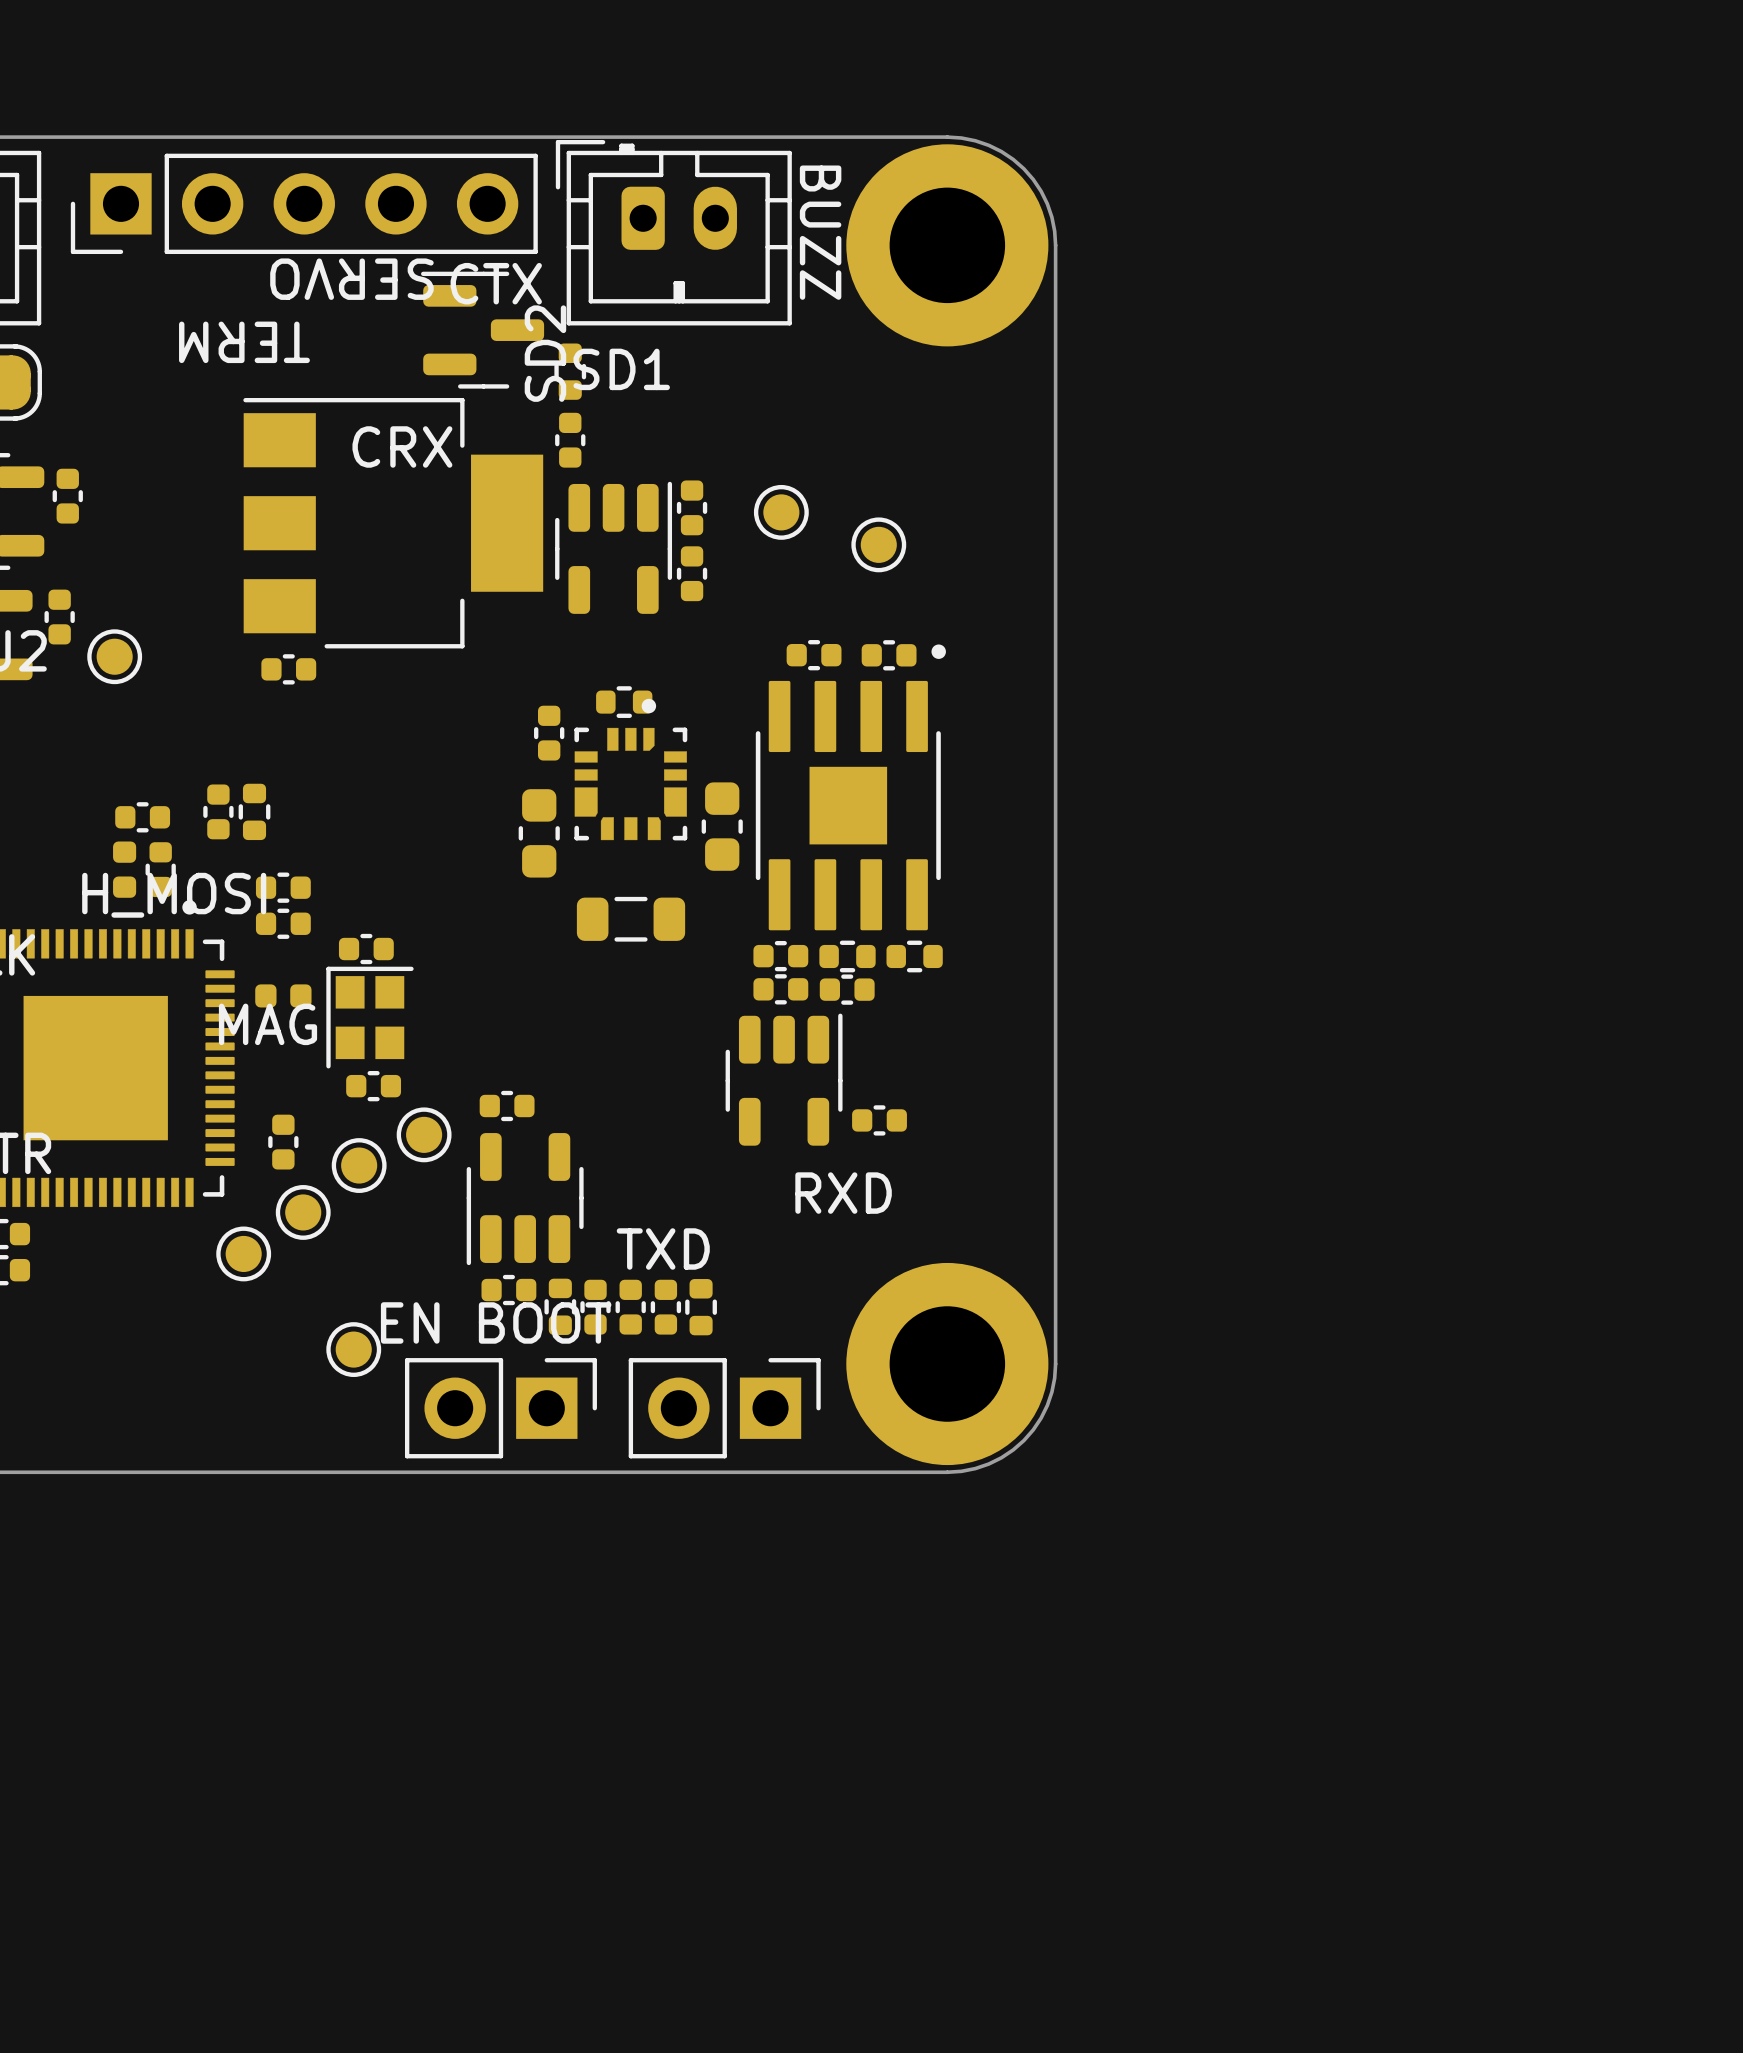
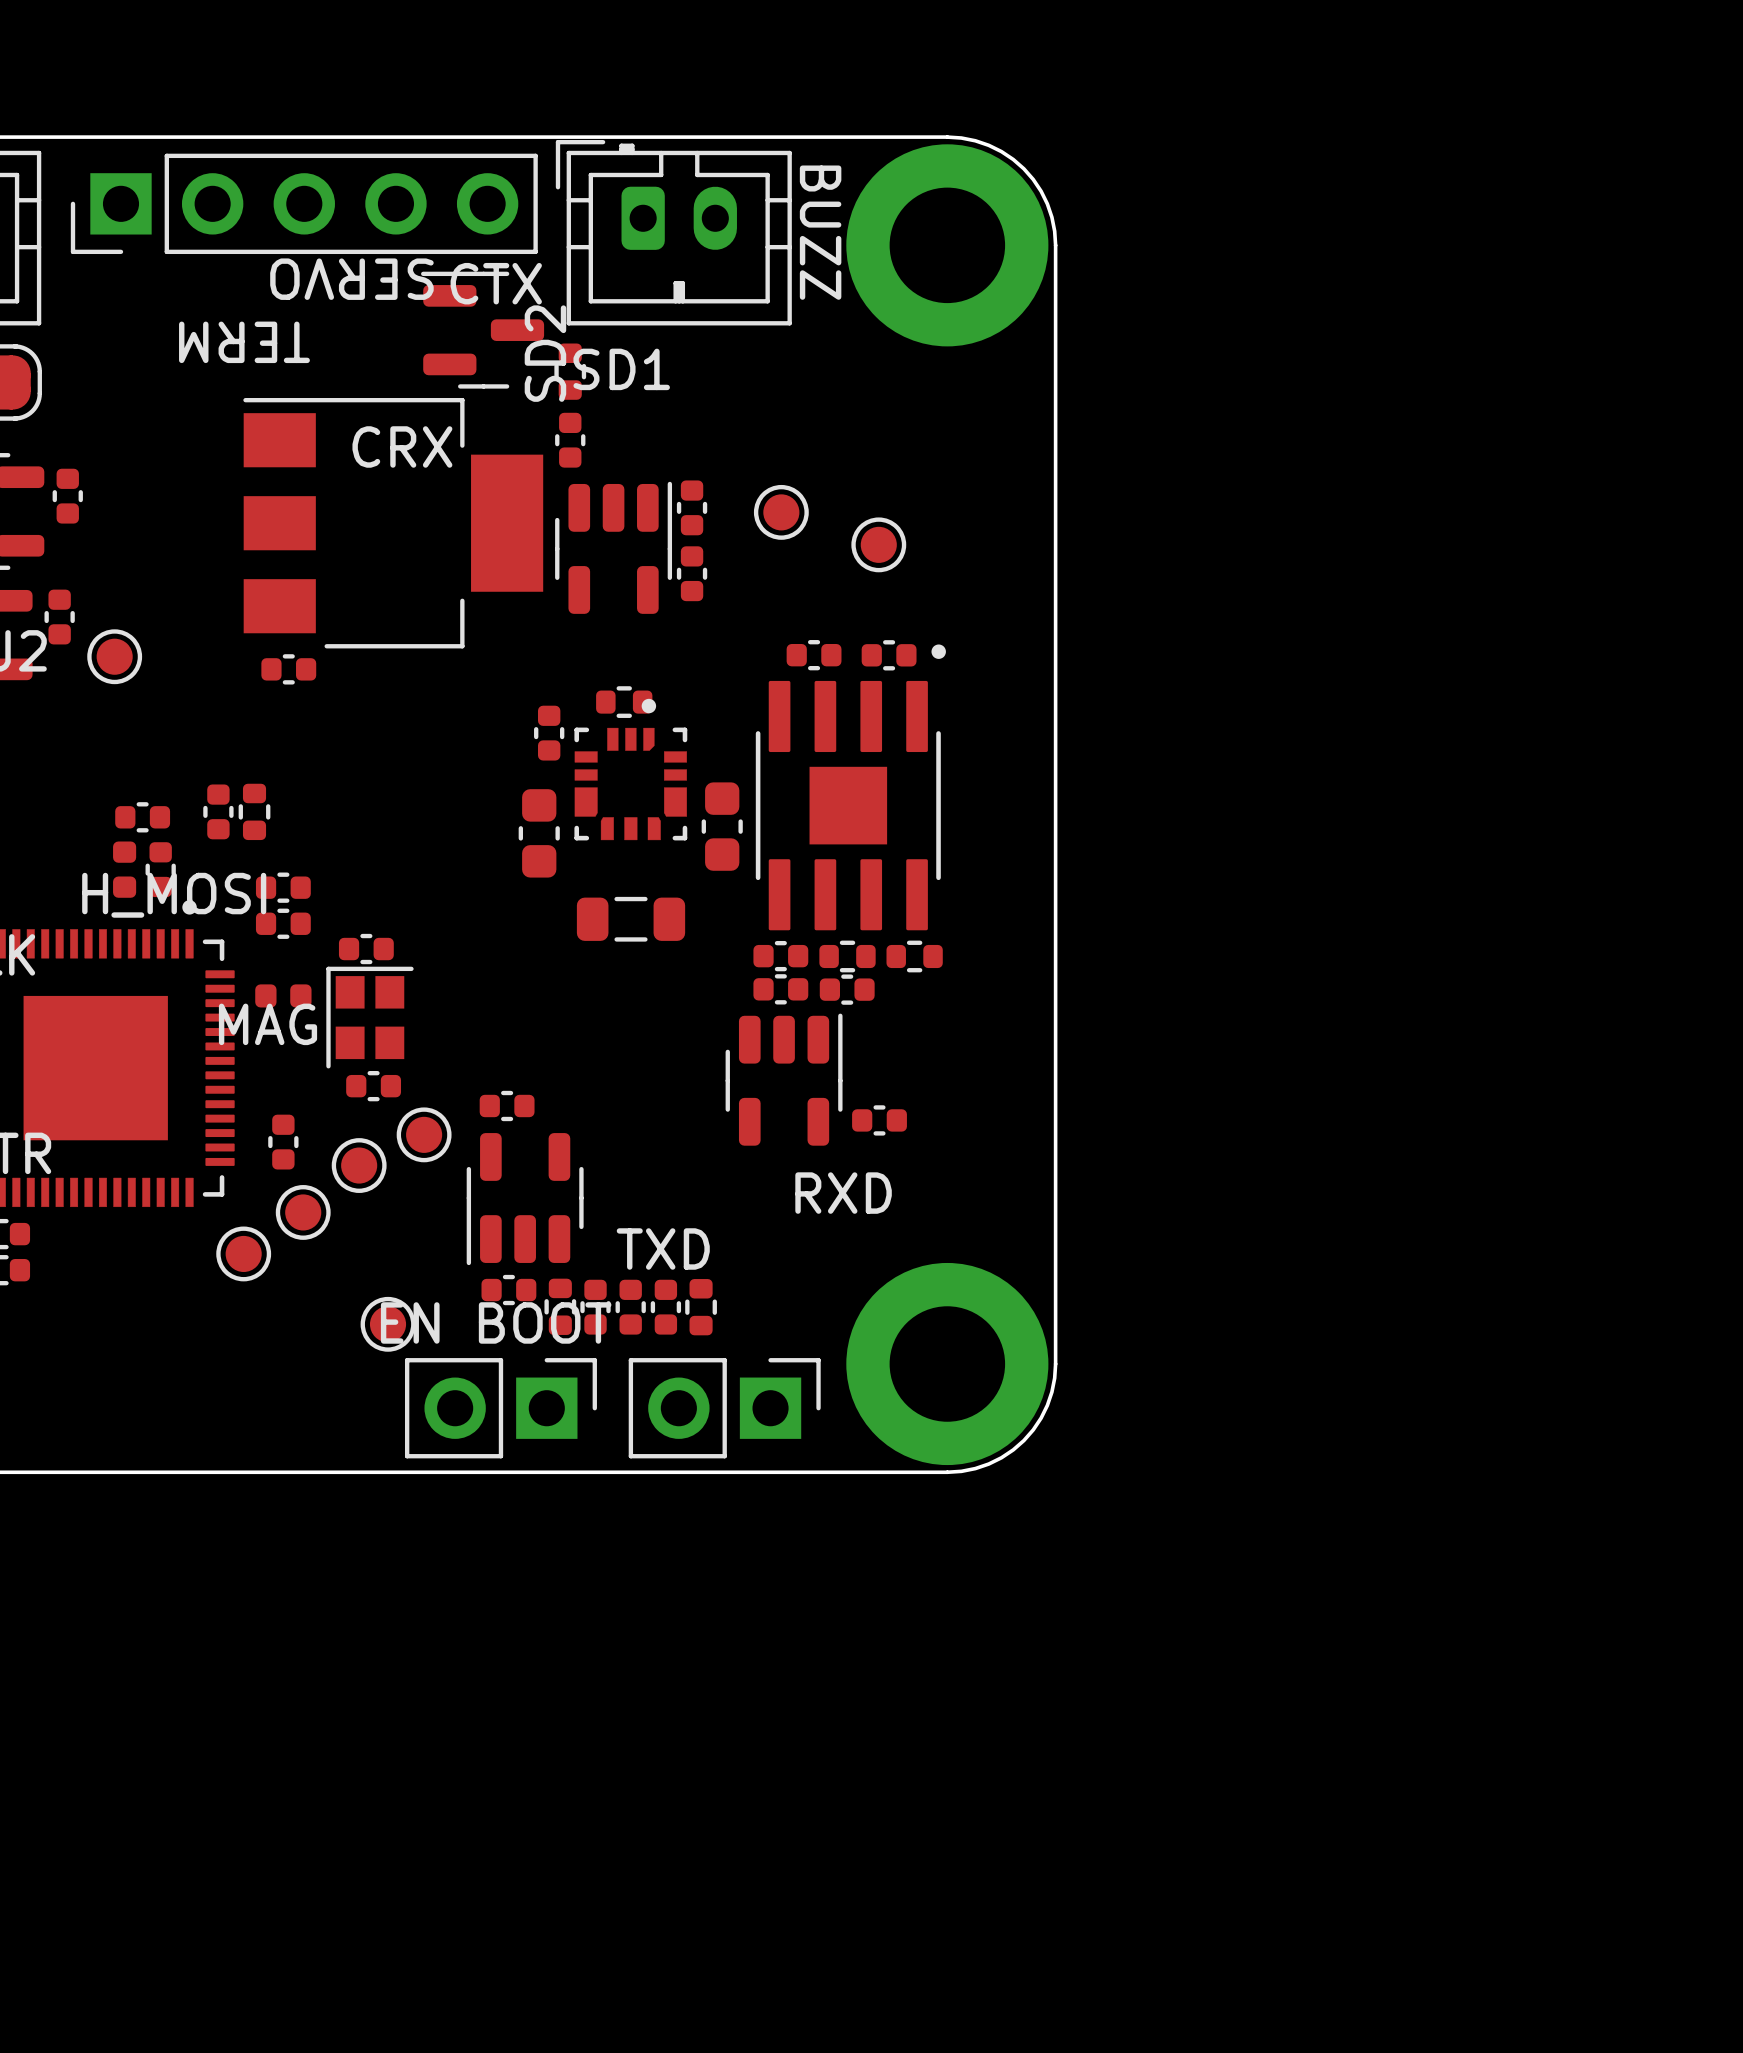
part position: (353, 1349) -> (388, 1324)

